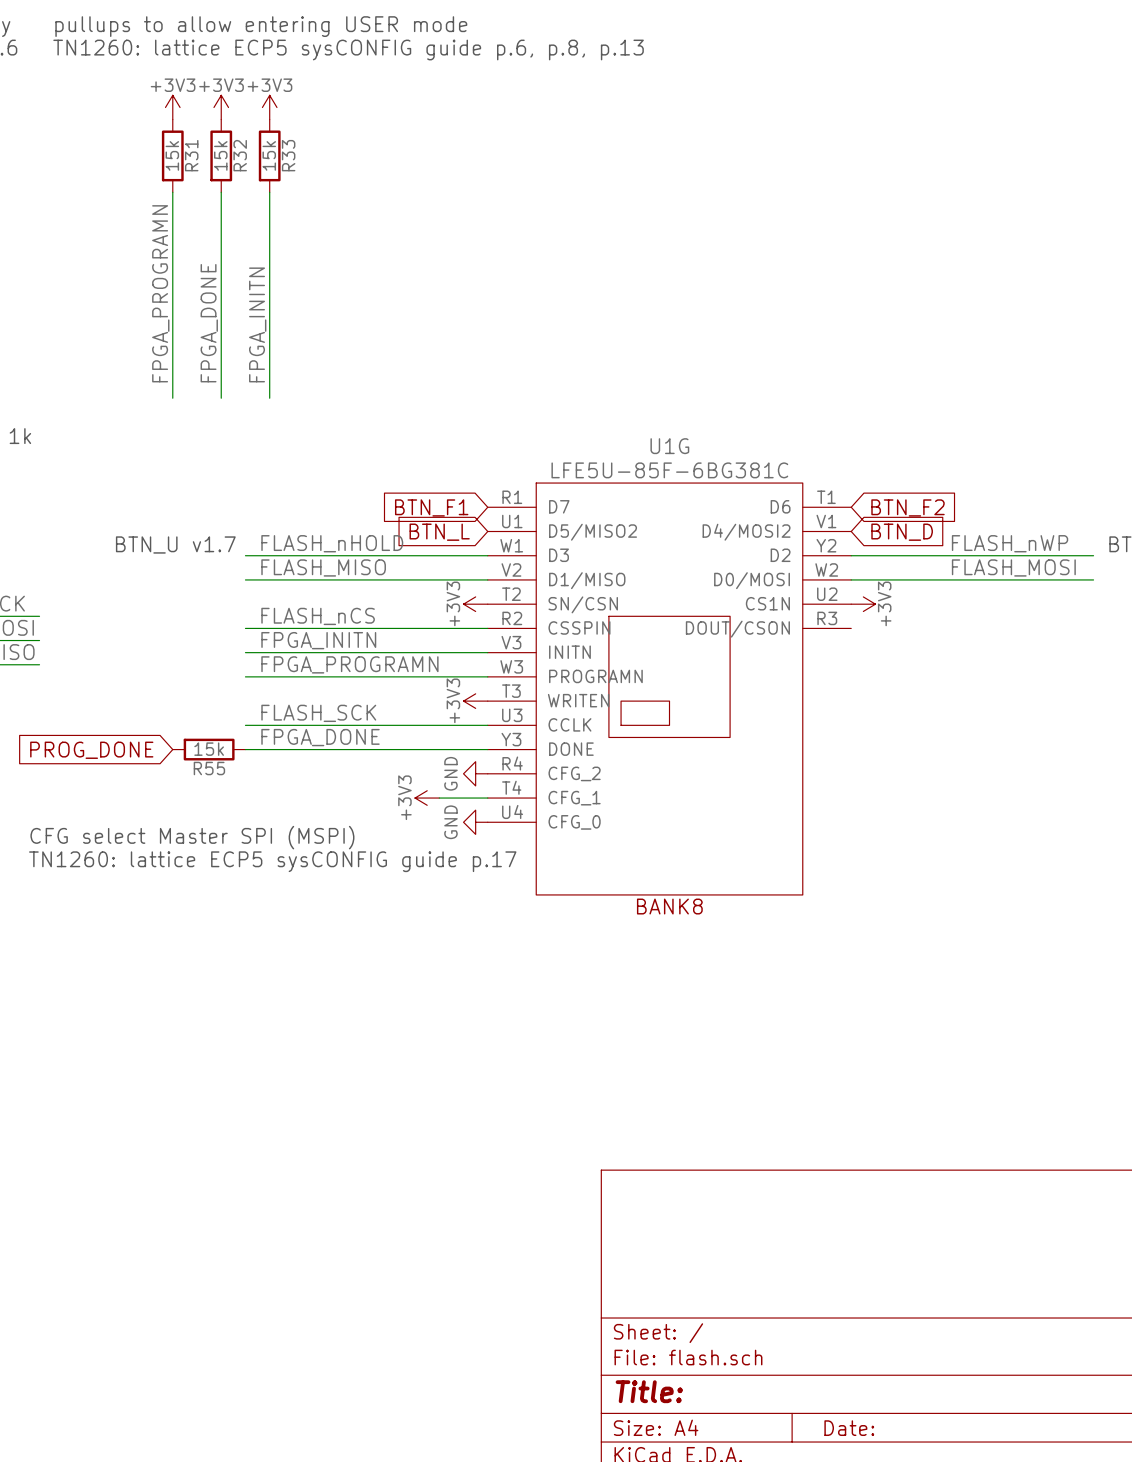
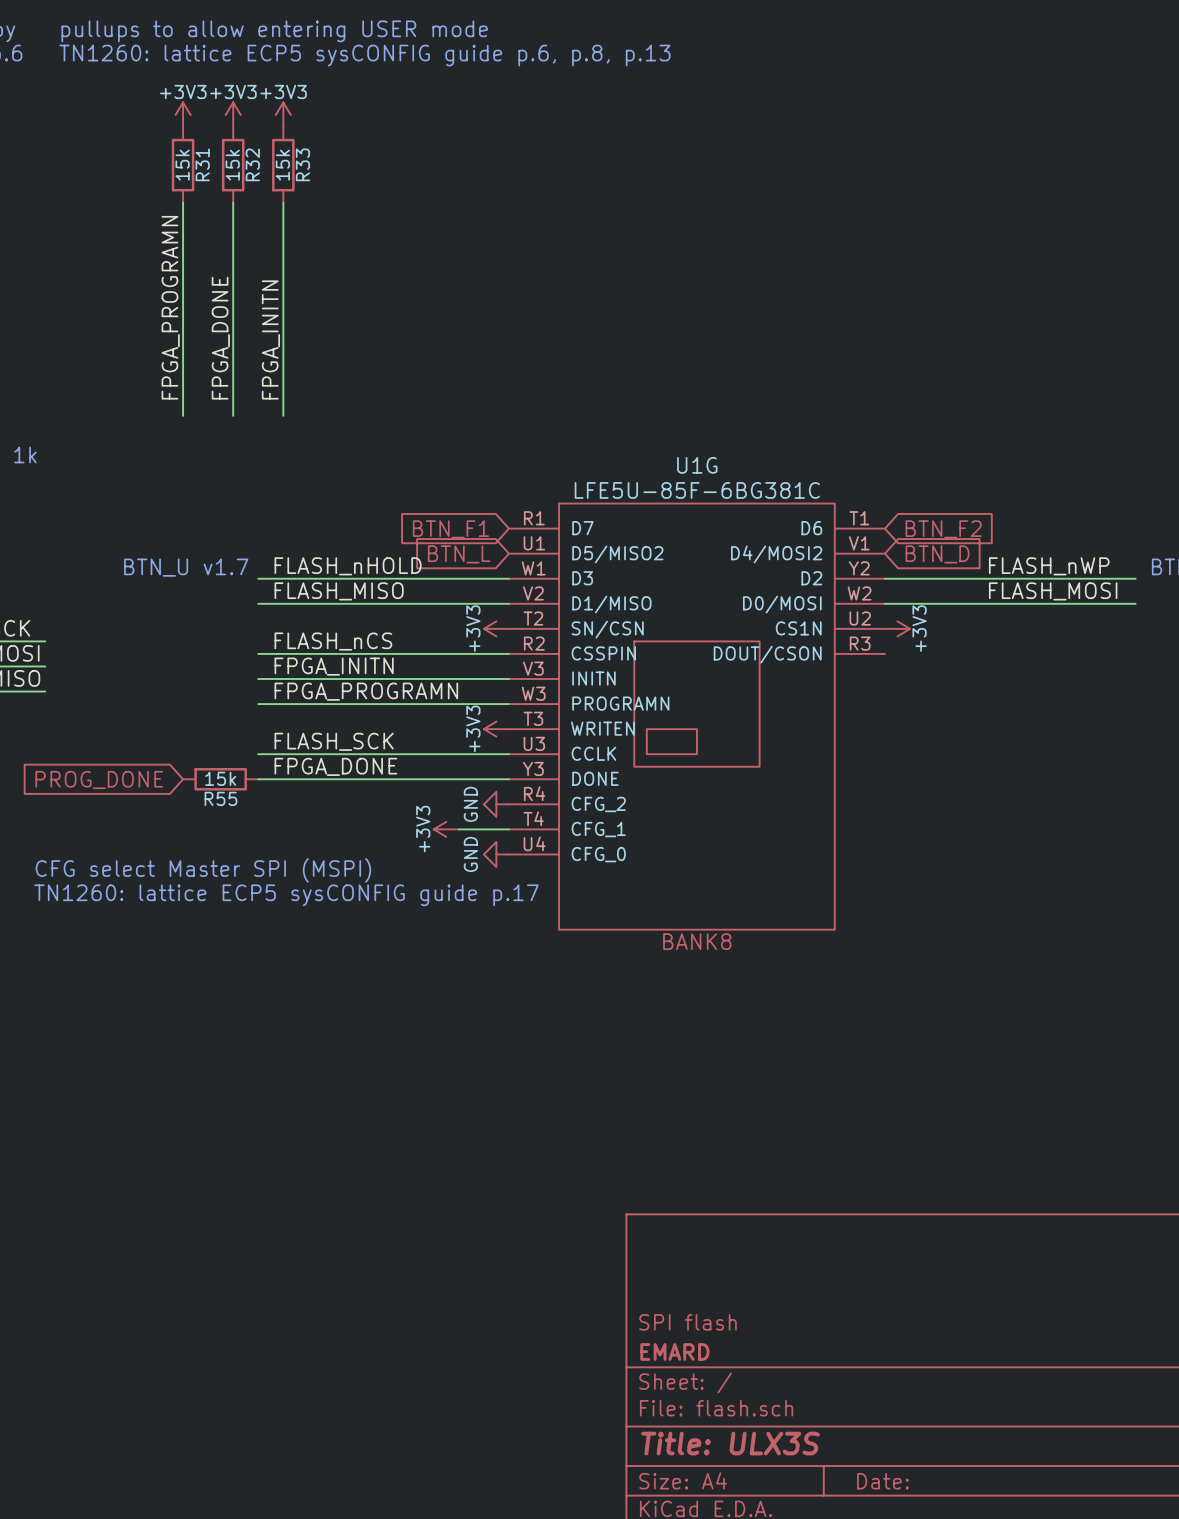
title block: none -> SPI flash (688, 1322)
title block: none -> EMARD (674, 1351)
title block: Title: (649, 1391) -> Title: ULX3S (730, 1443)

